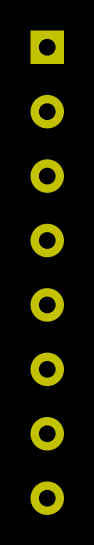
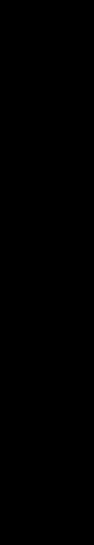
part: (47, 272) -> none

